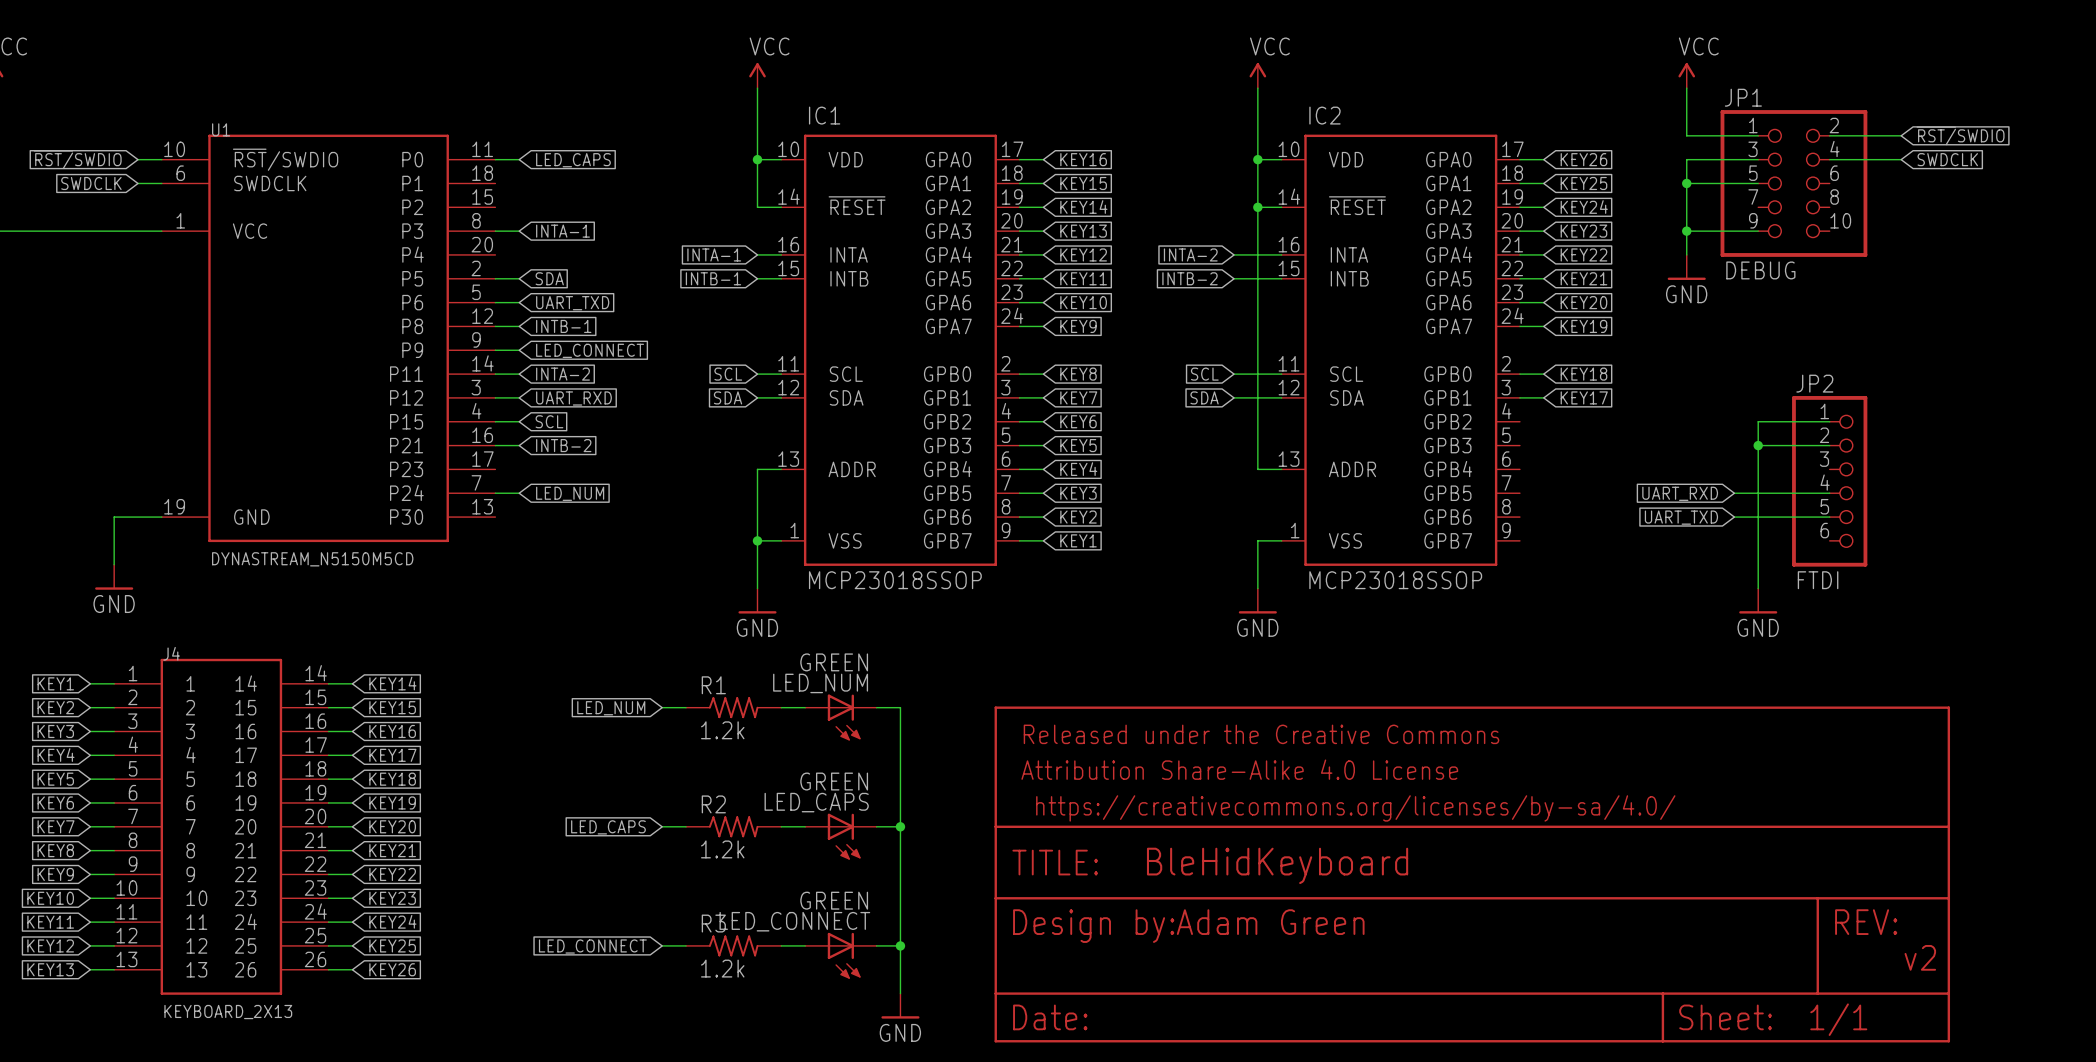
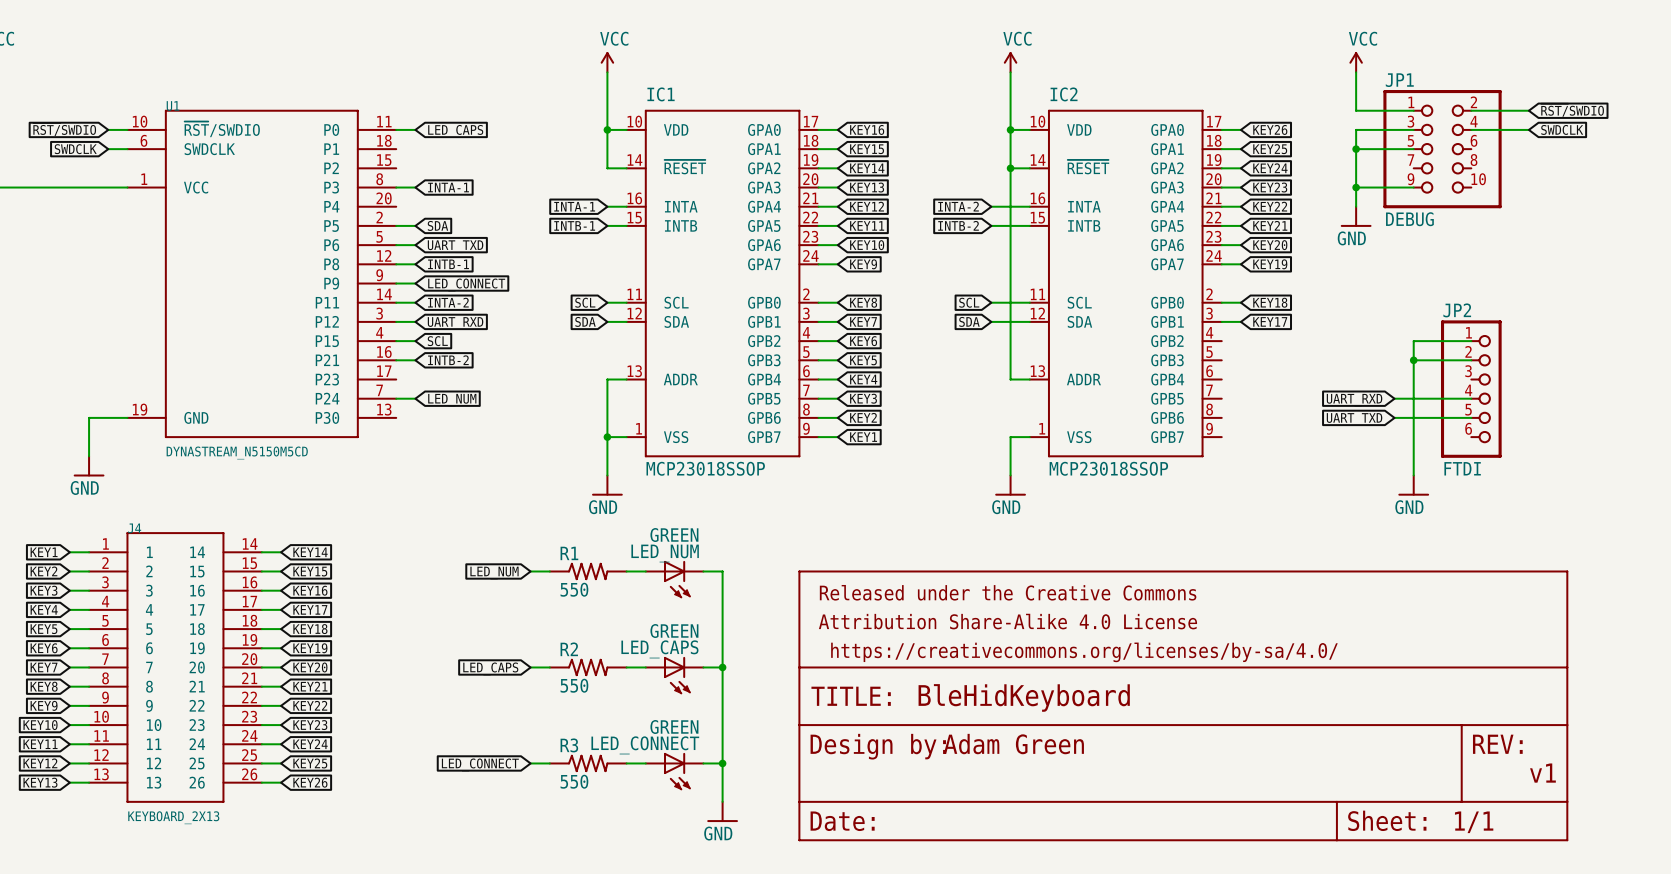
R1 value: 1.2k (722, 730) -> 550 (574, 589)
R2 value: 1.2k (722, 849) -> 550 (574, 685)
text: v2 (1920, 957) -> v1 (1542, 773)
R3 value: 1.2k (722, 968) -> 550 (574, 781)

